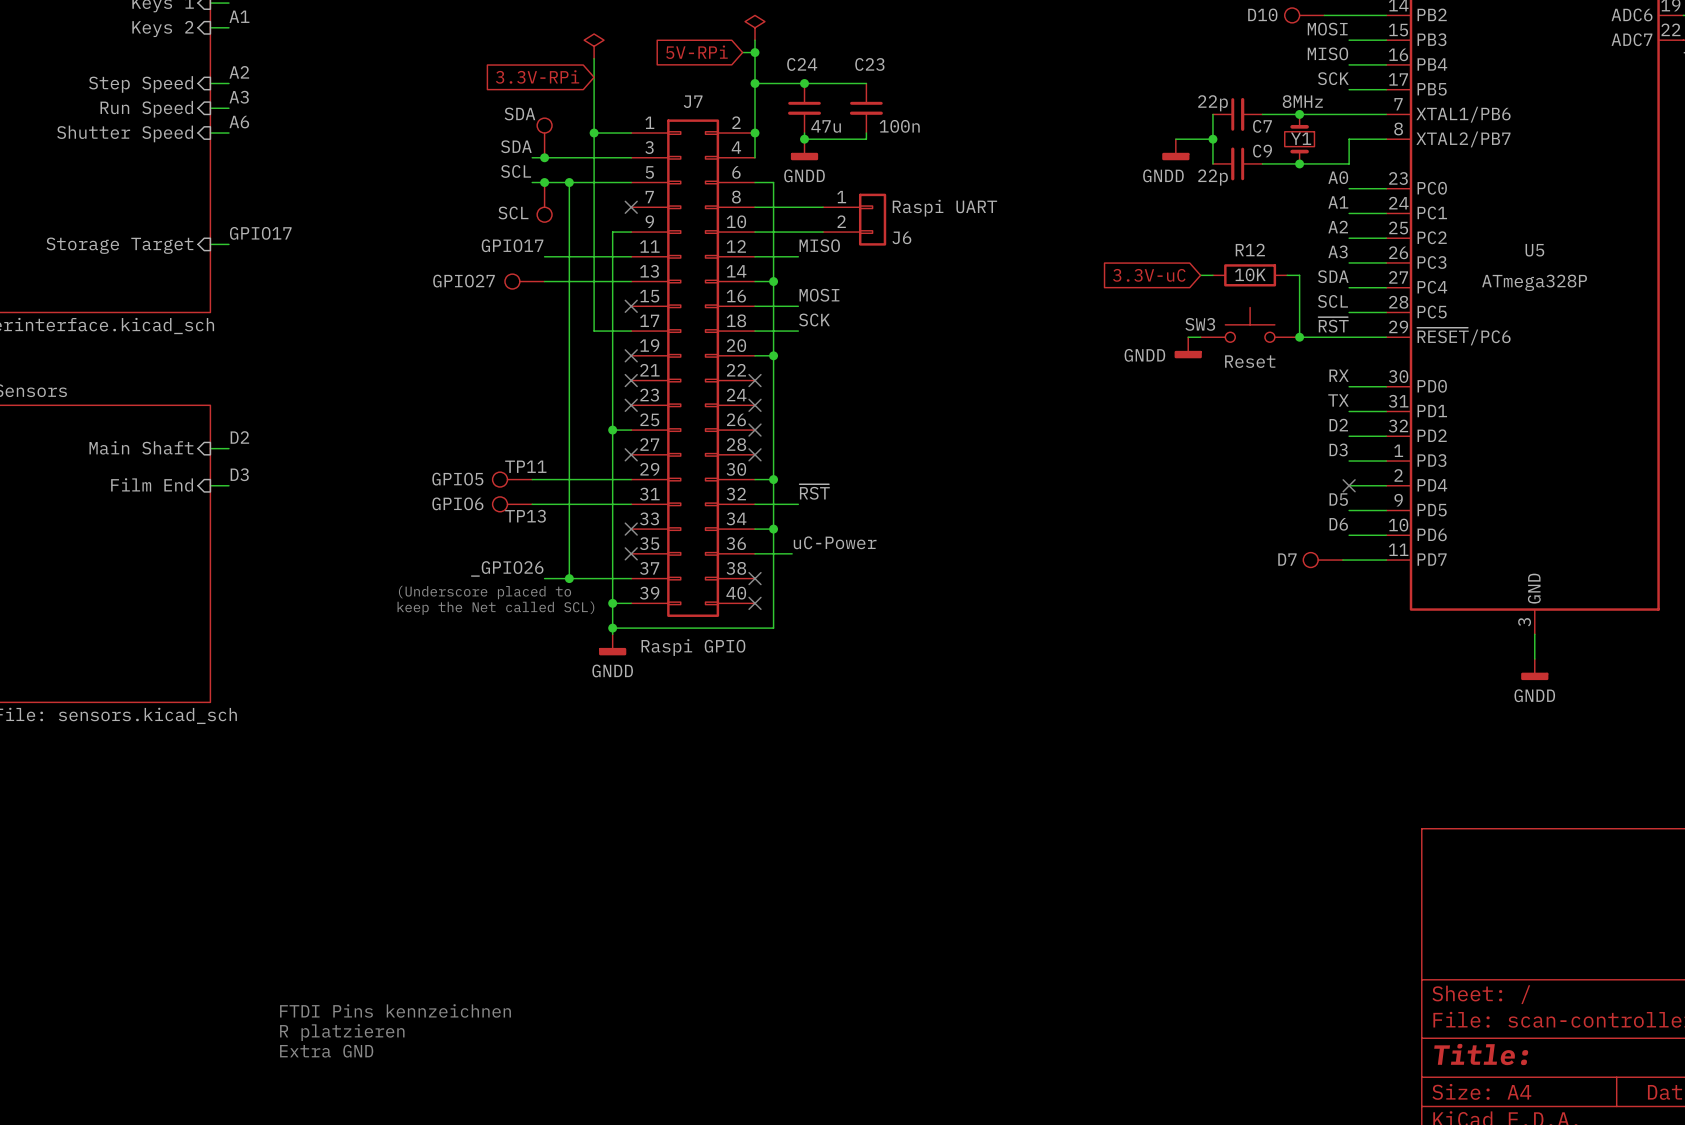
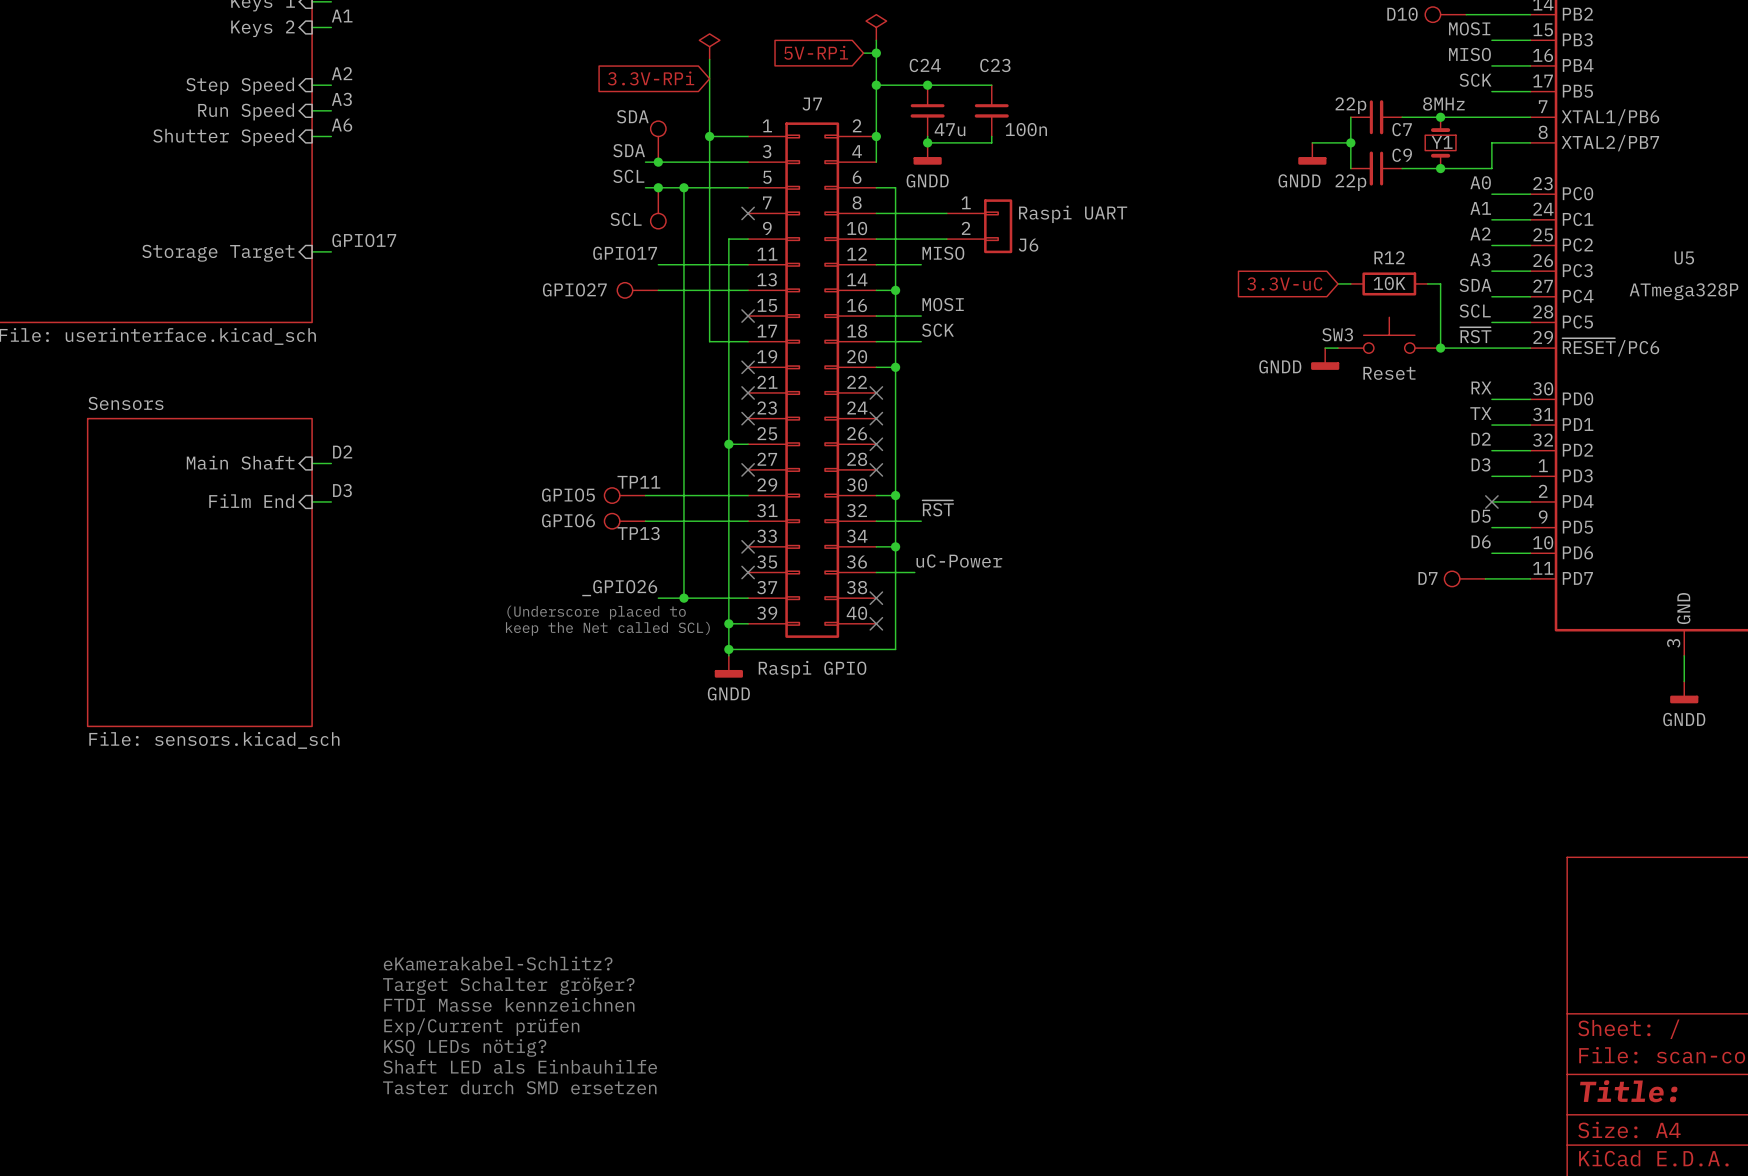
text: none -> eKamerakabel-Schlitz? (498, 963)
text: none -> Target Schalter größer? (508, 986)
text: none -> FTDI Masse kennzeichnen (509, 1004)
text: none -> Exp/Current prüfen (481, 1027)
text: FTDI Pins kennzeichnen (395, 1010) -> KSQ LEDs nötig? (465, 1047)
text: R platzieren (342, 1032) -> Shaft LED als Einbauhilfe (520, 1066)
text: Extra GND (326, 1051) -> Taster durch SMD ersetzen (519, 1087)

